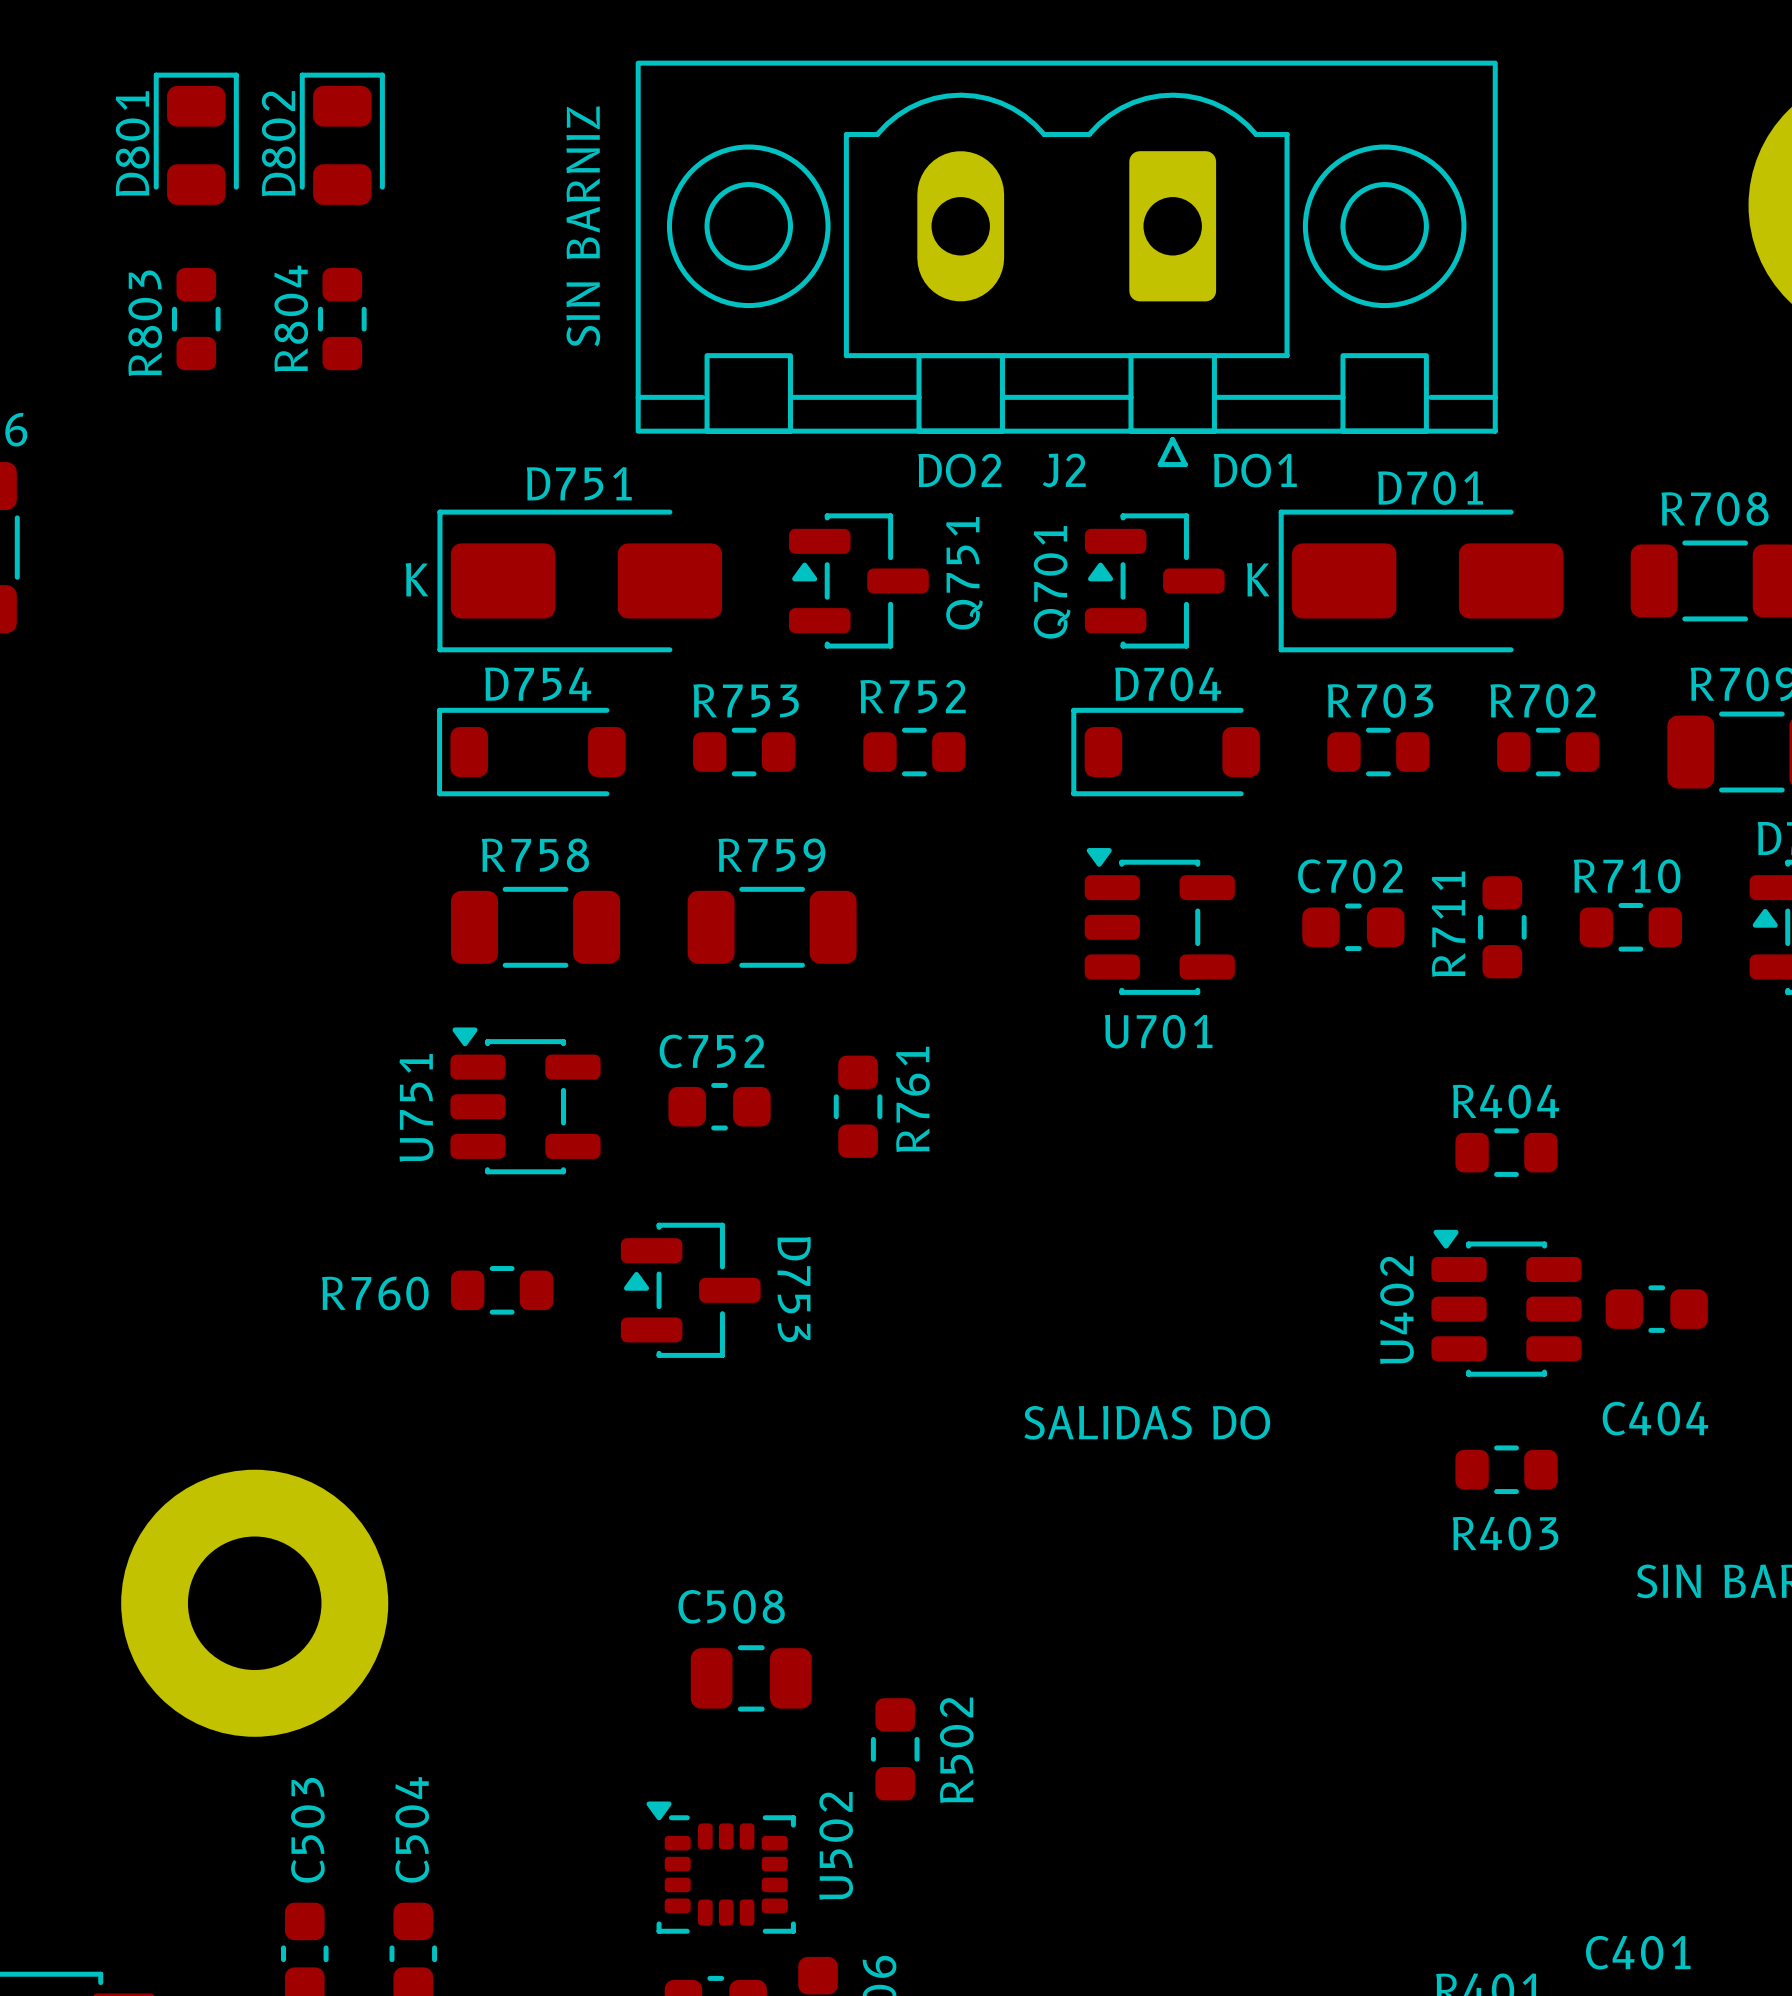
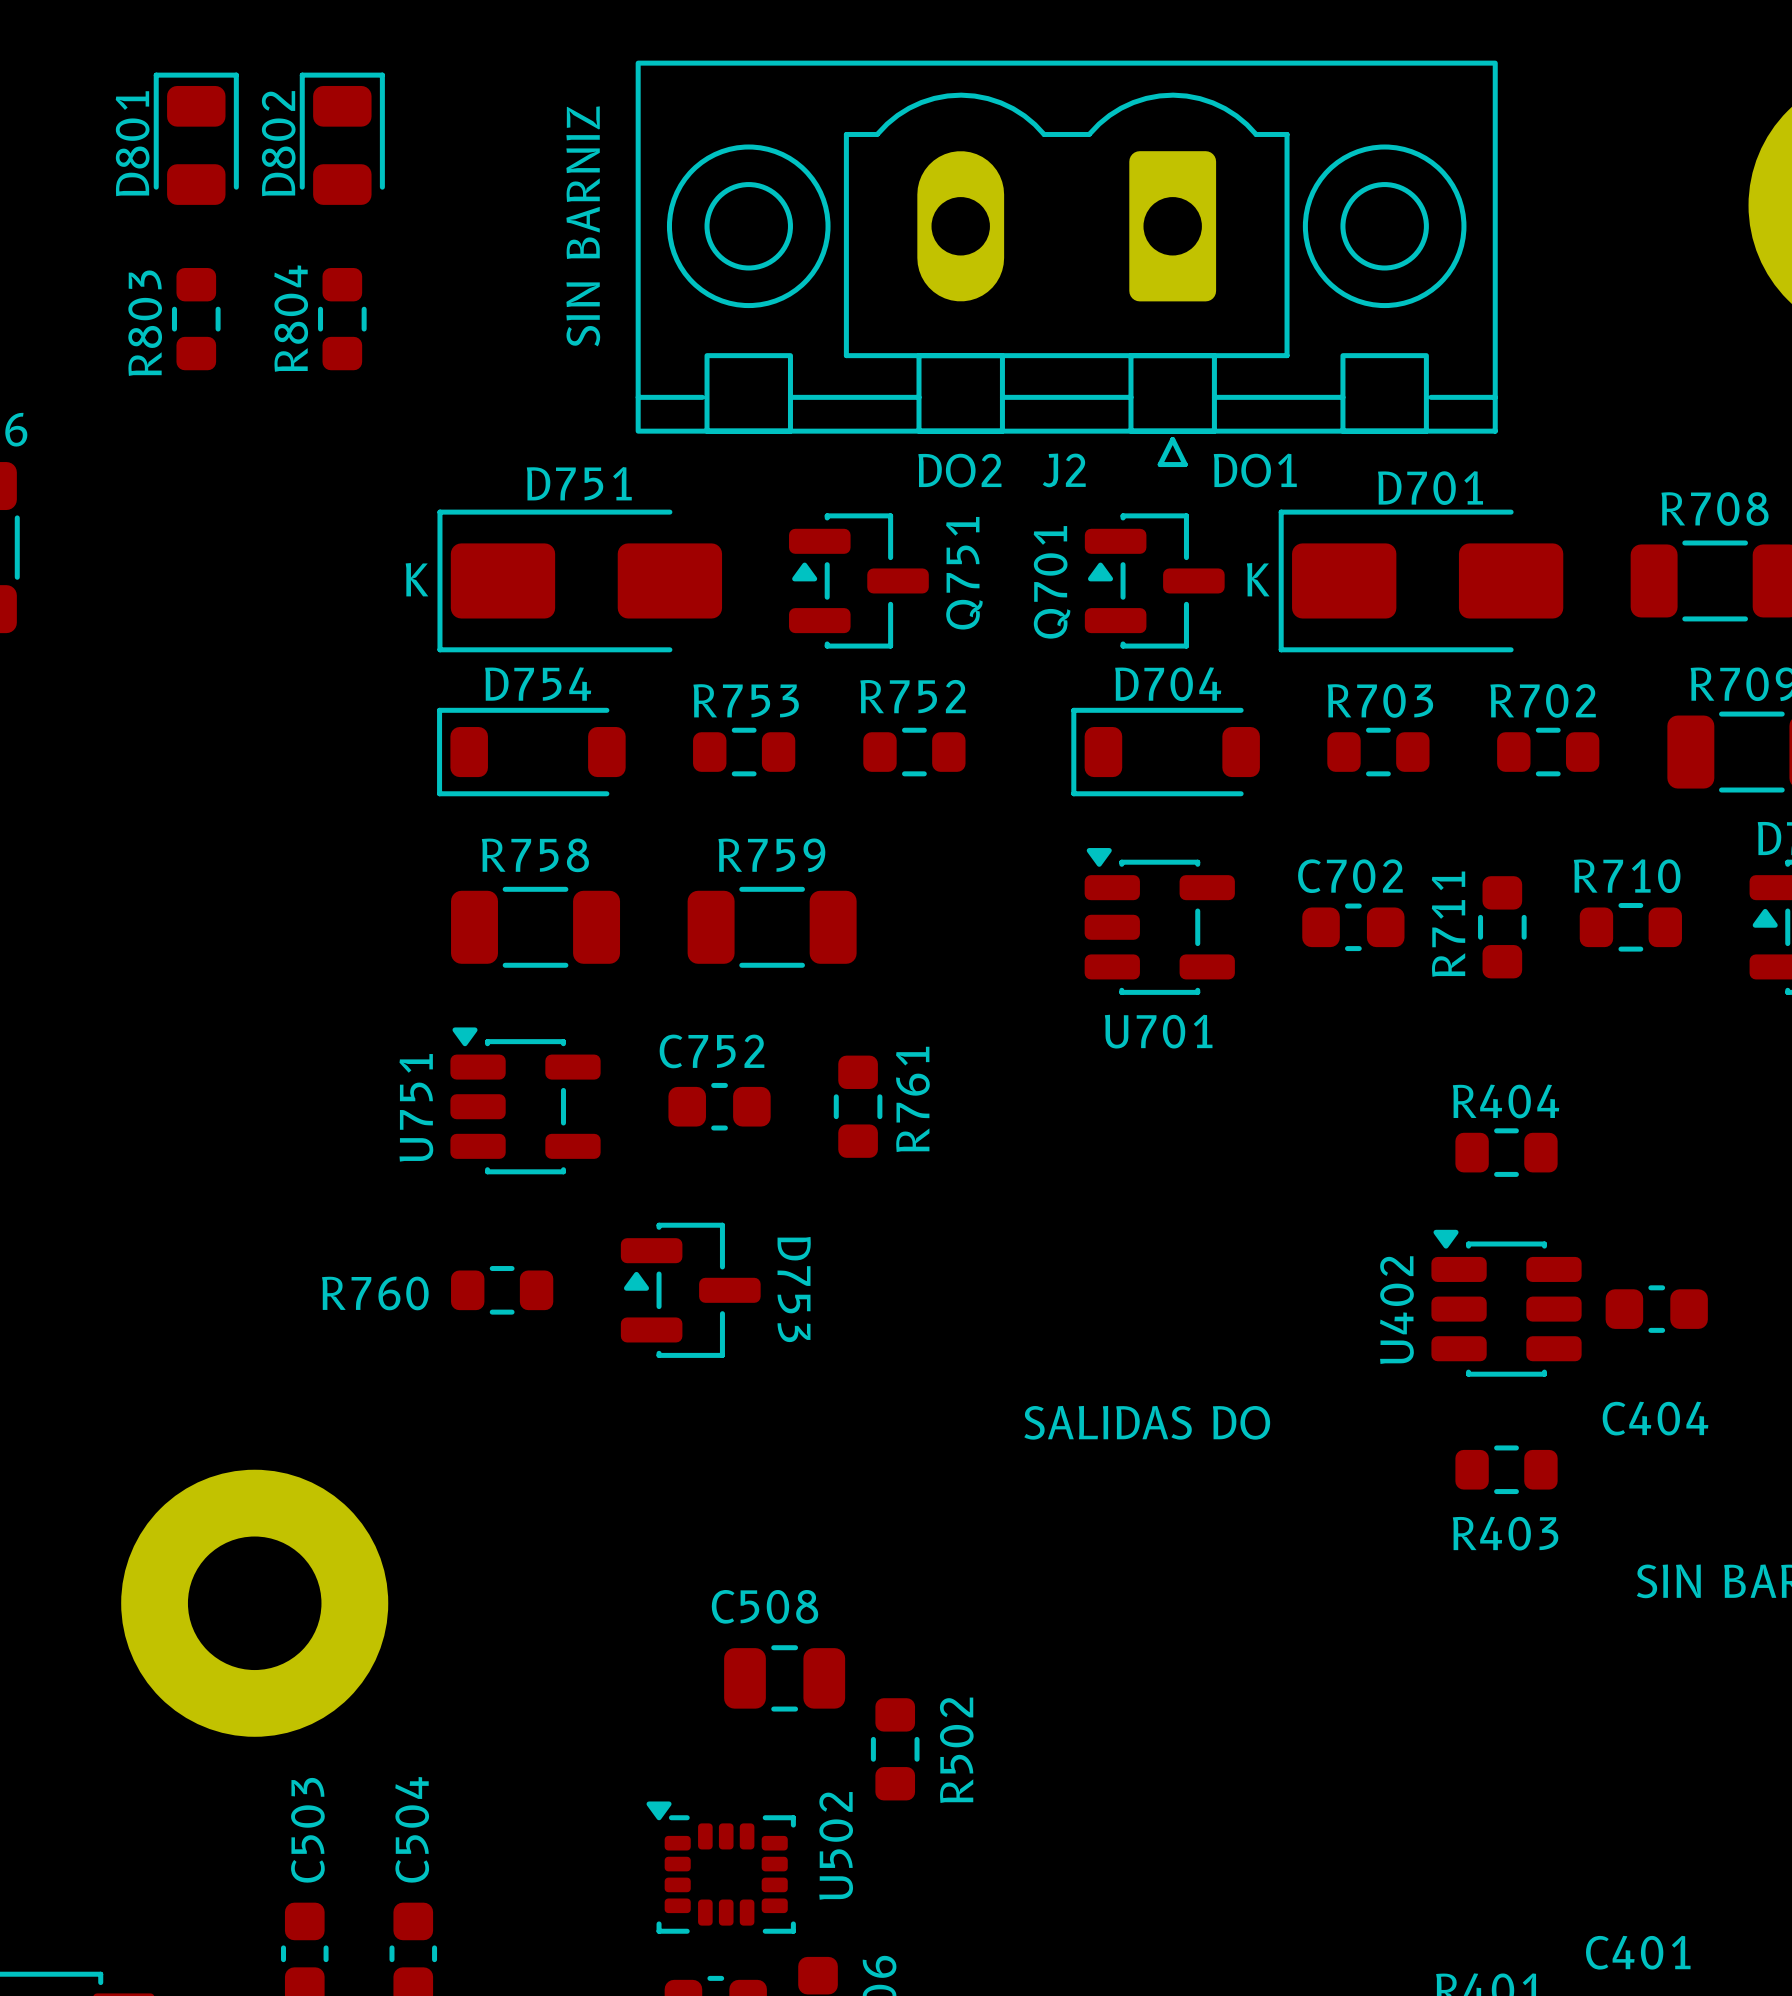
C508 position: (751, 1678) -> (784, 1678)

